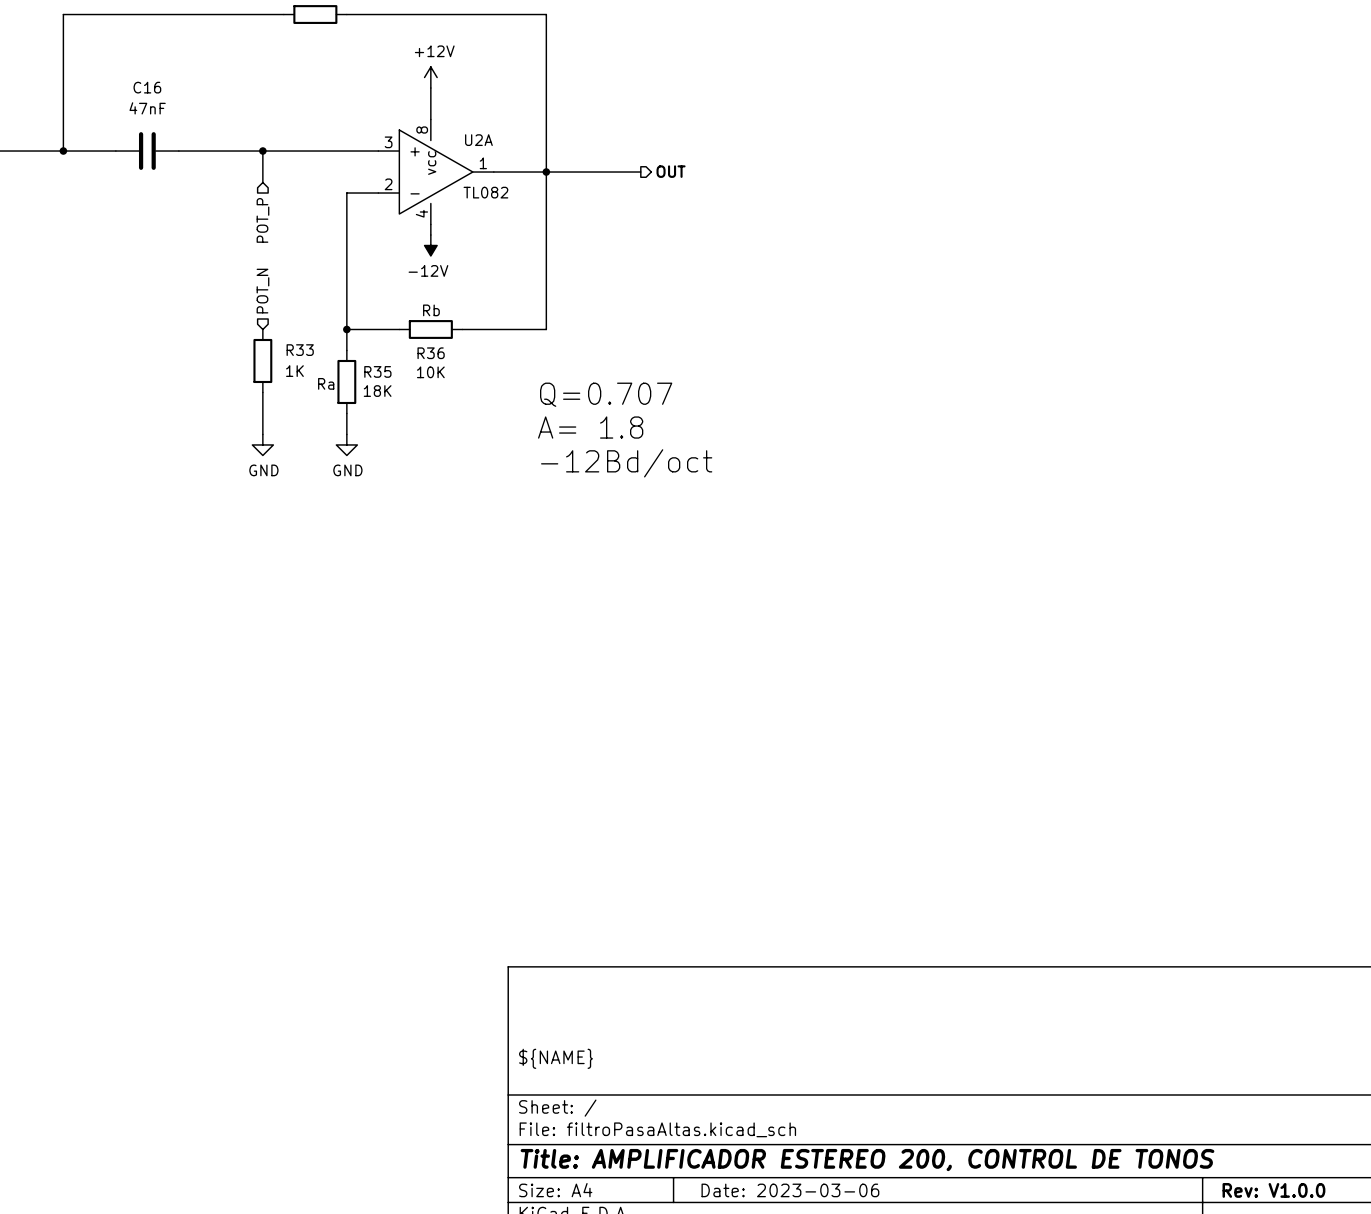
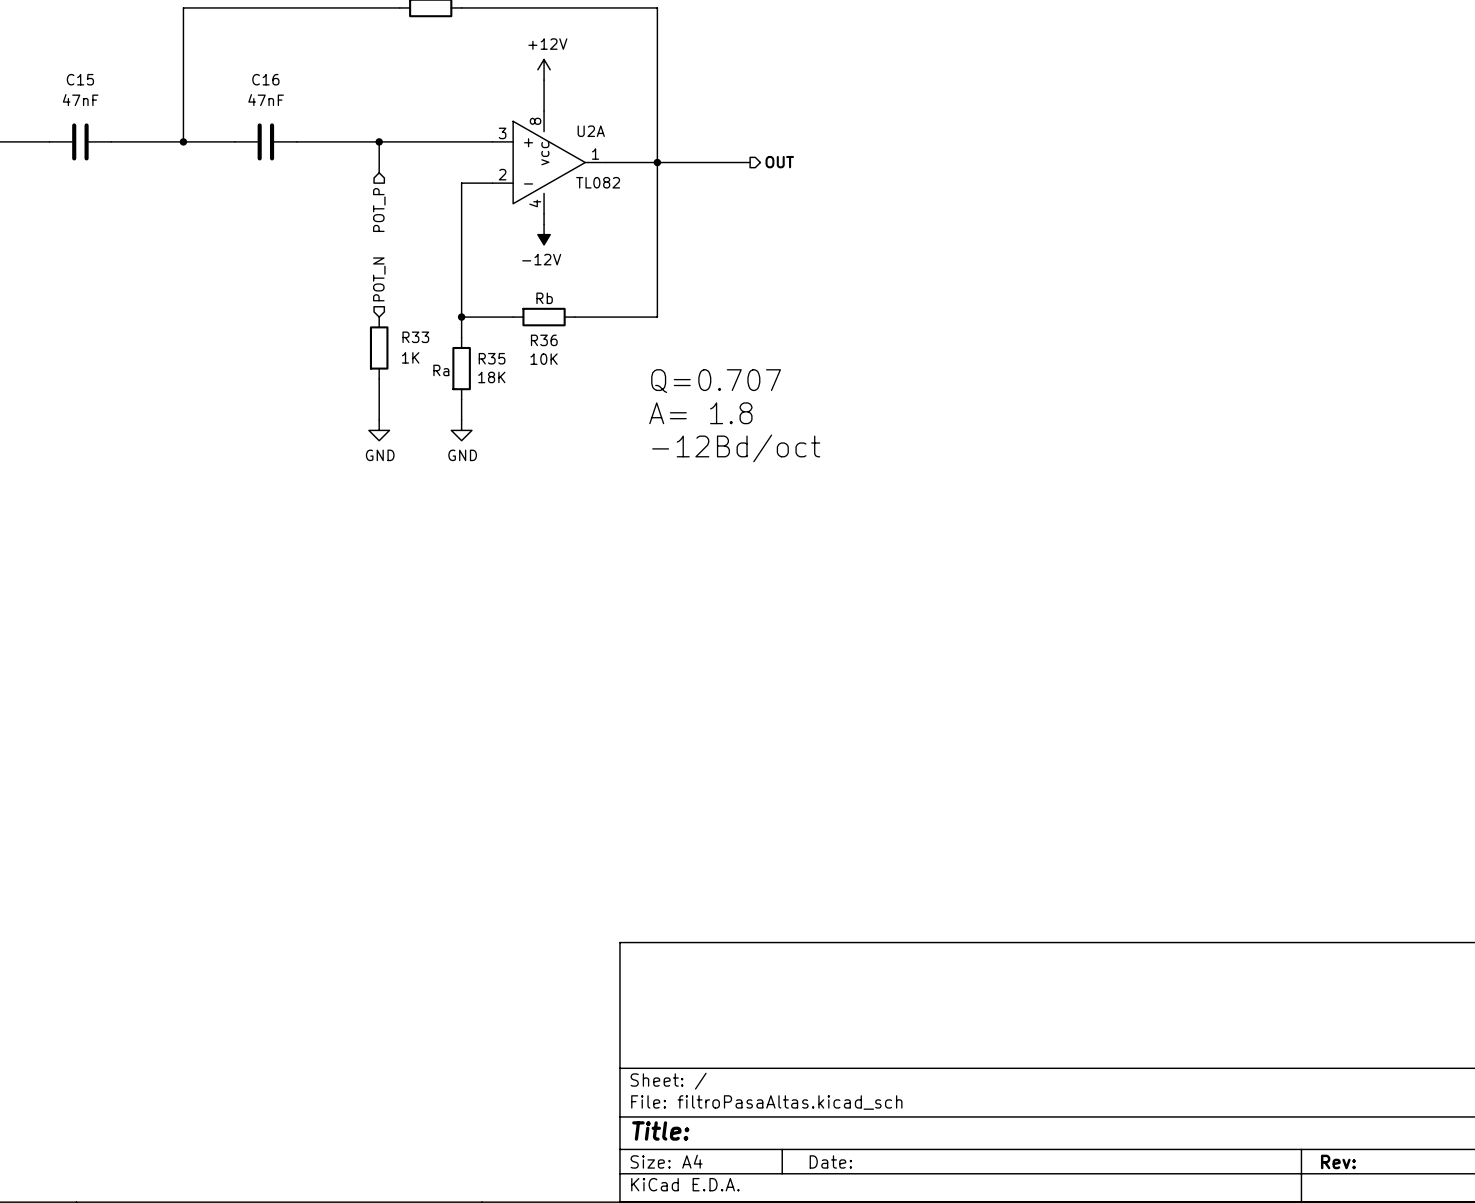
title block: ${NAME} (556, 1058) -> none
title block: Title: AMPLIFICADOR ESTEREO 200, CONTROL DE TONOS (867, 1160) -> Title: (660, 1130)
title block: Date: 2023-03-06 (790, 1190) -> Date: (830, 1161)
title block: Rev: V1.0.0 (1273, 1190) -> Rev: (1338, 1161)

